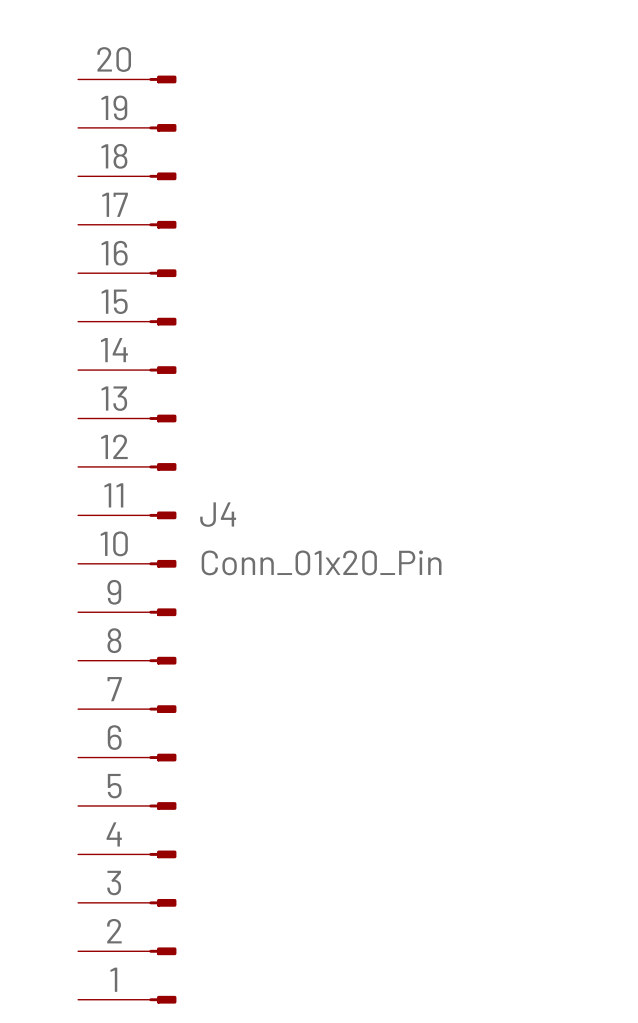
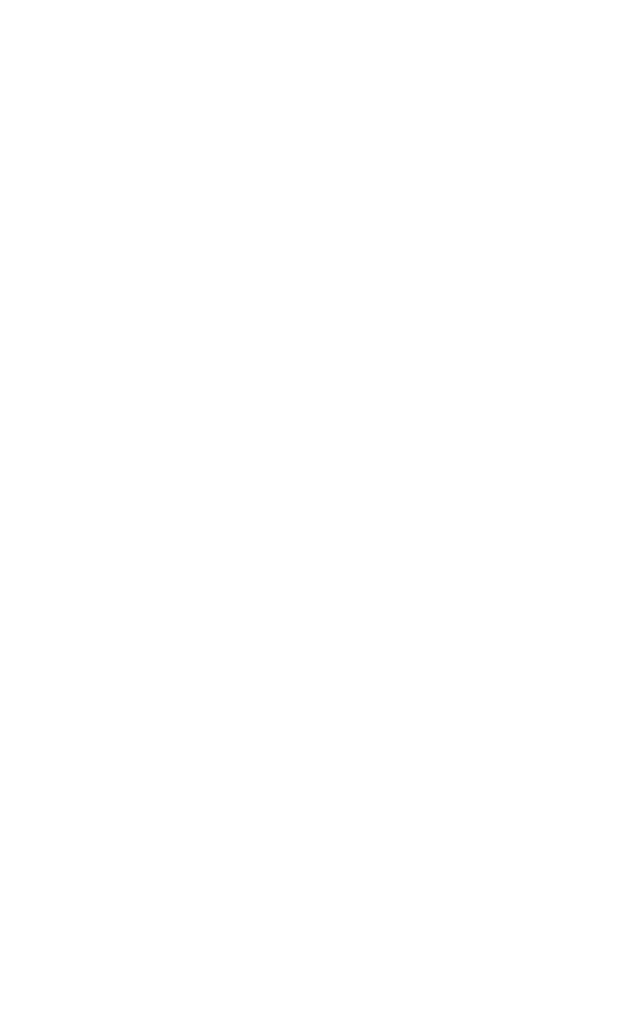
J4: Conn_01x20_Pin (127, 539) -> none

